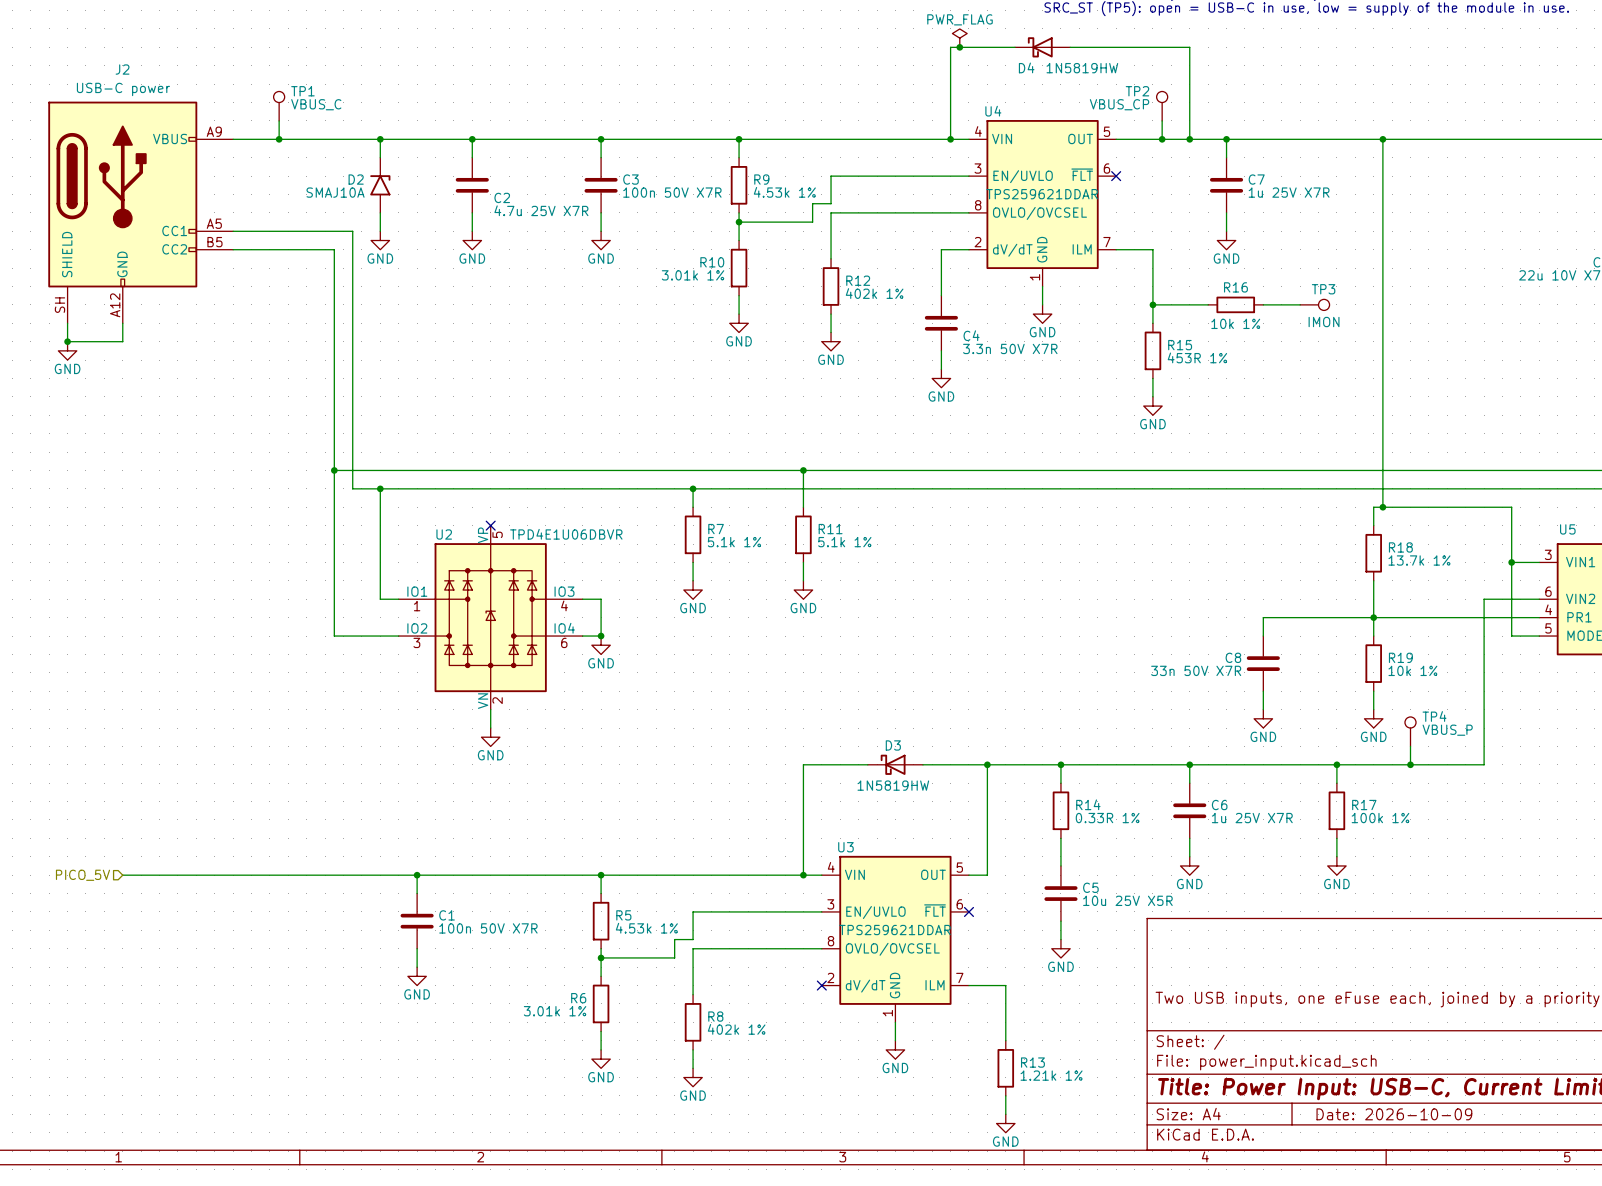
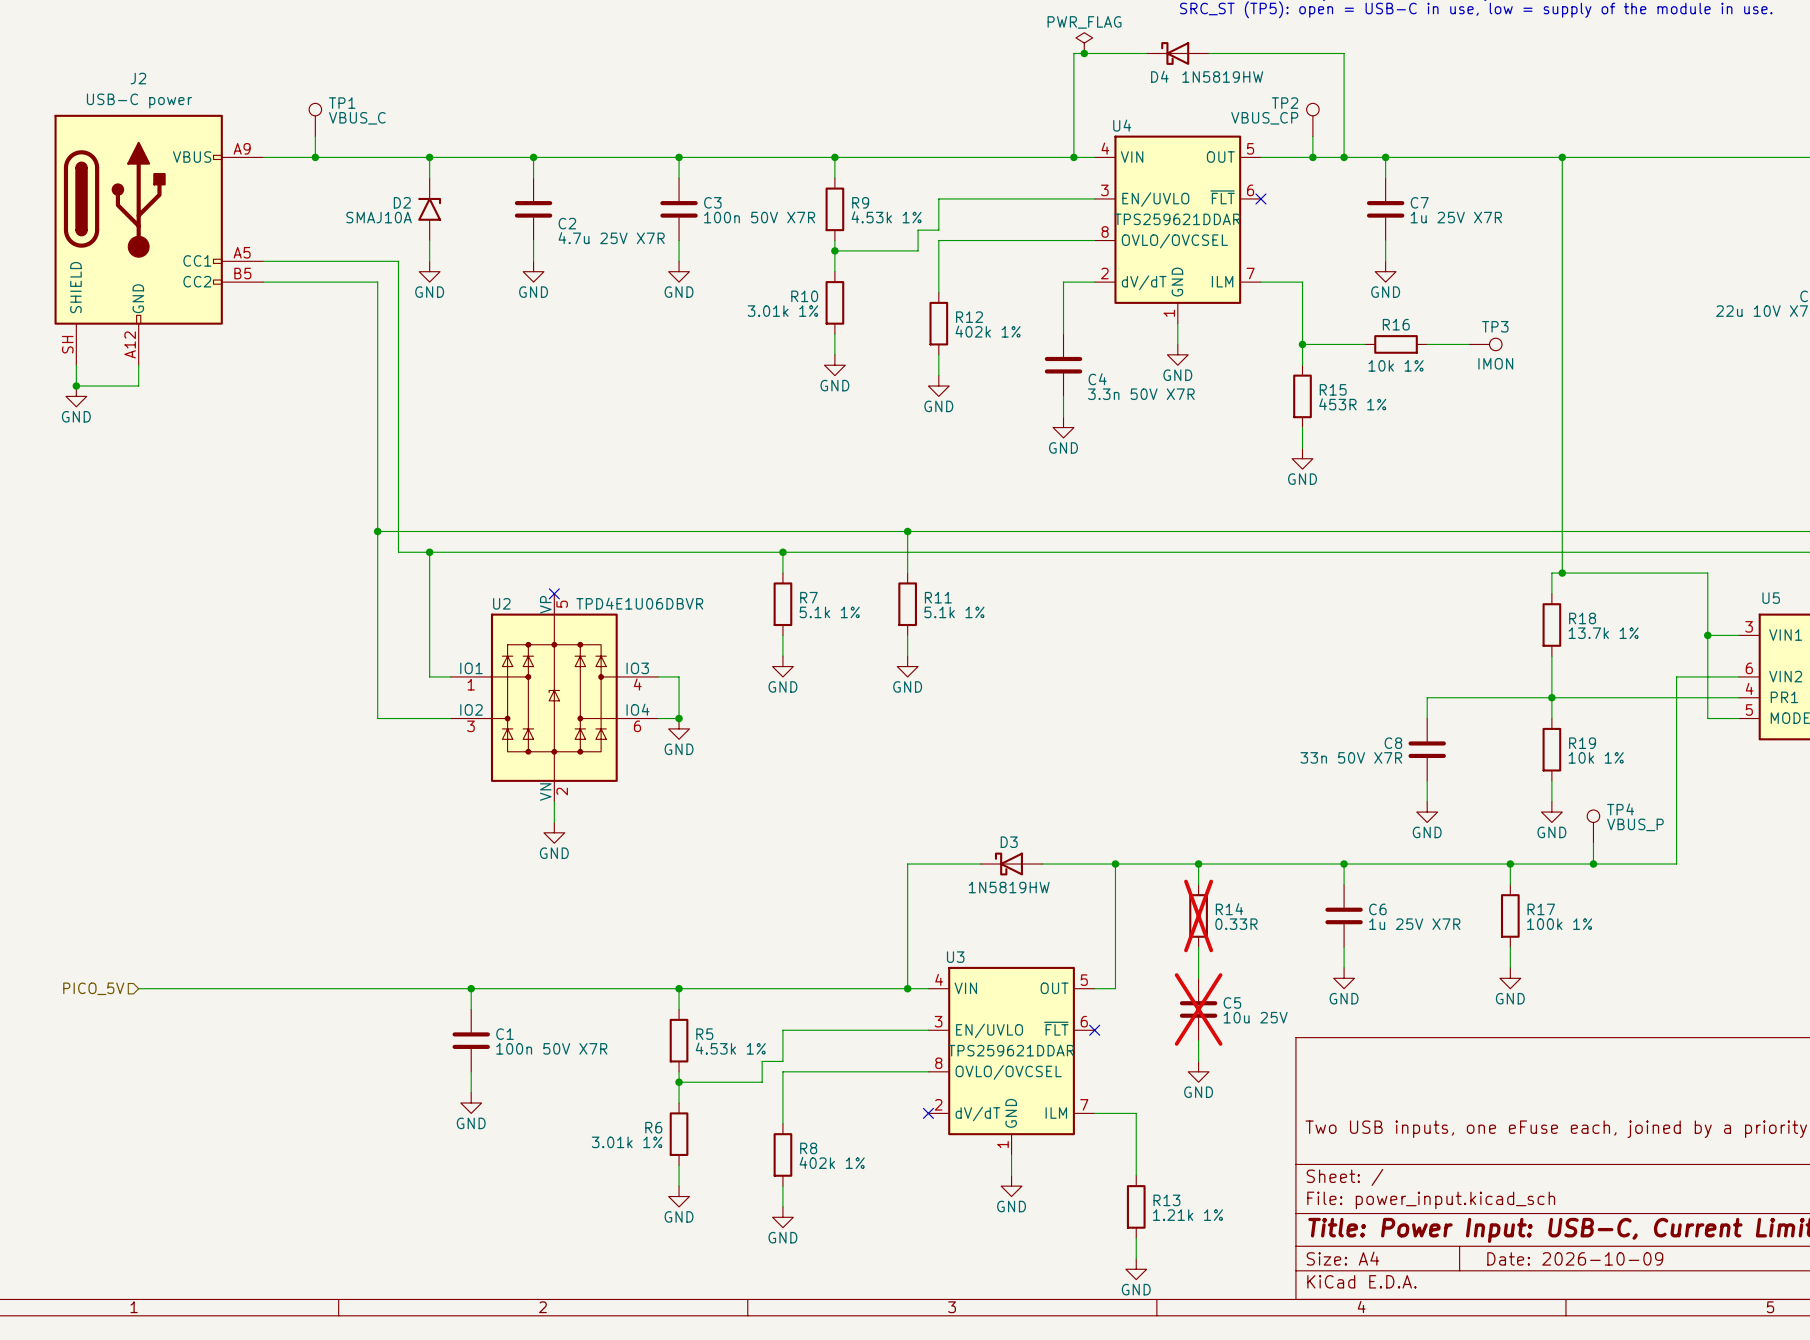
R14 do-not-place cross: none -> (1198, 915)
R14 value: 0.33R 1% (1107, 818) -> 0.33R (1236, 924)
C5 do-not-place cross: none -> (1198, 1009)
C5 value: 10u 25V X5R (1127, 900) -> 10u 25V (1255, 1017)

